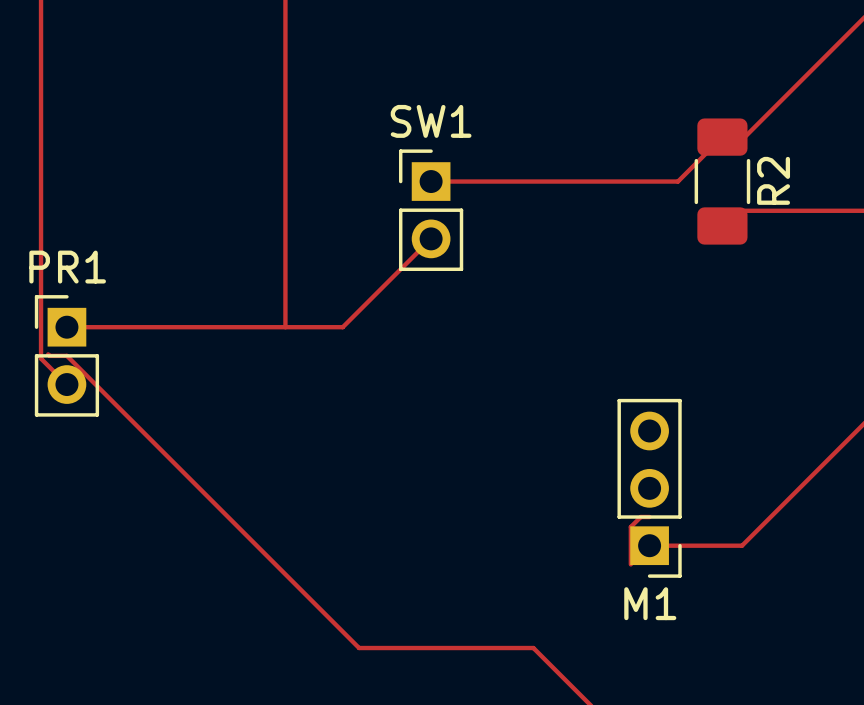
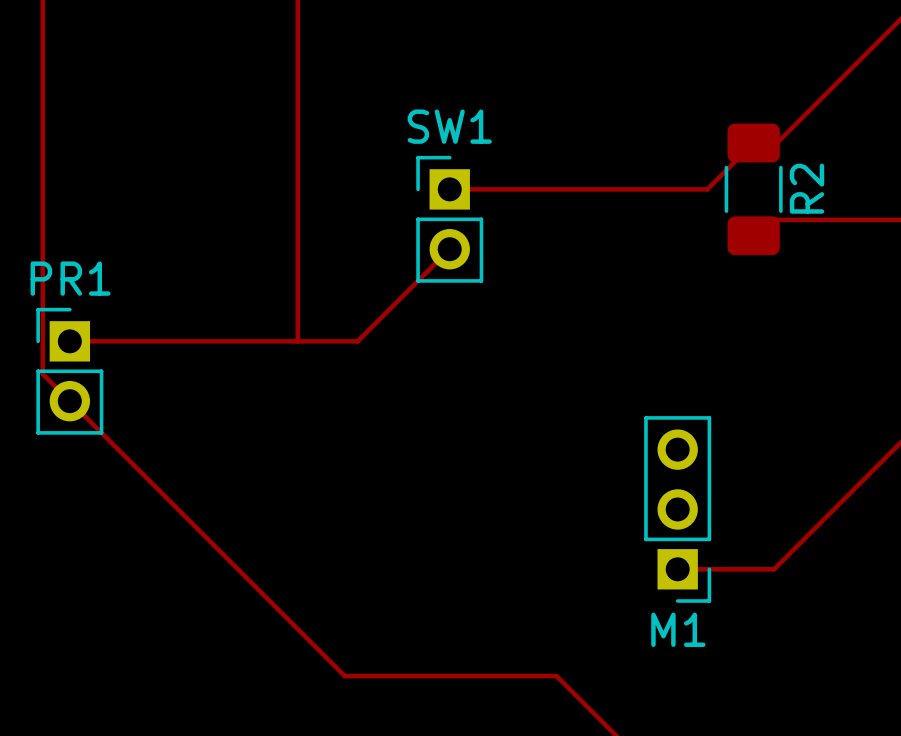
track: (48, 354) (66, 355) (359, 648) -> (69, 401) (344, 676) (374, 676)
track: (649, 517) (640, 517) (630, 526) (630, 564) -> none

